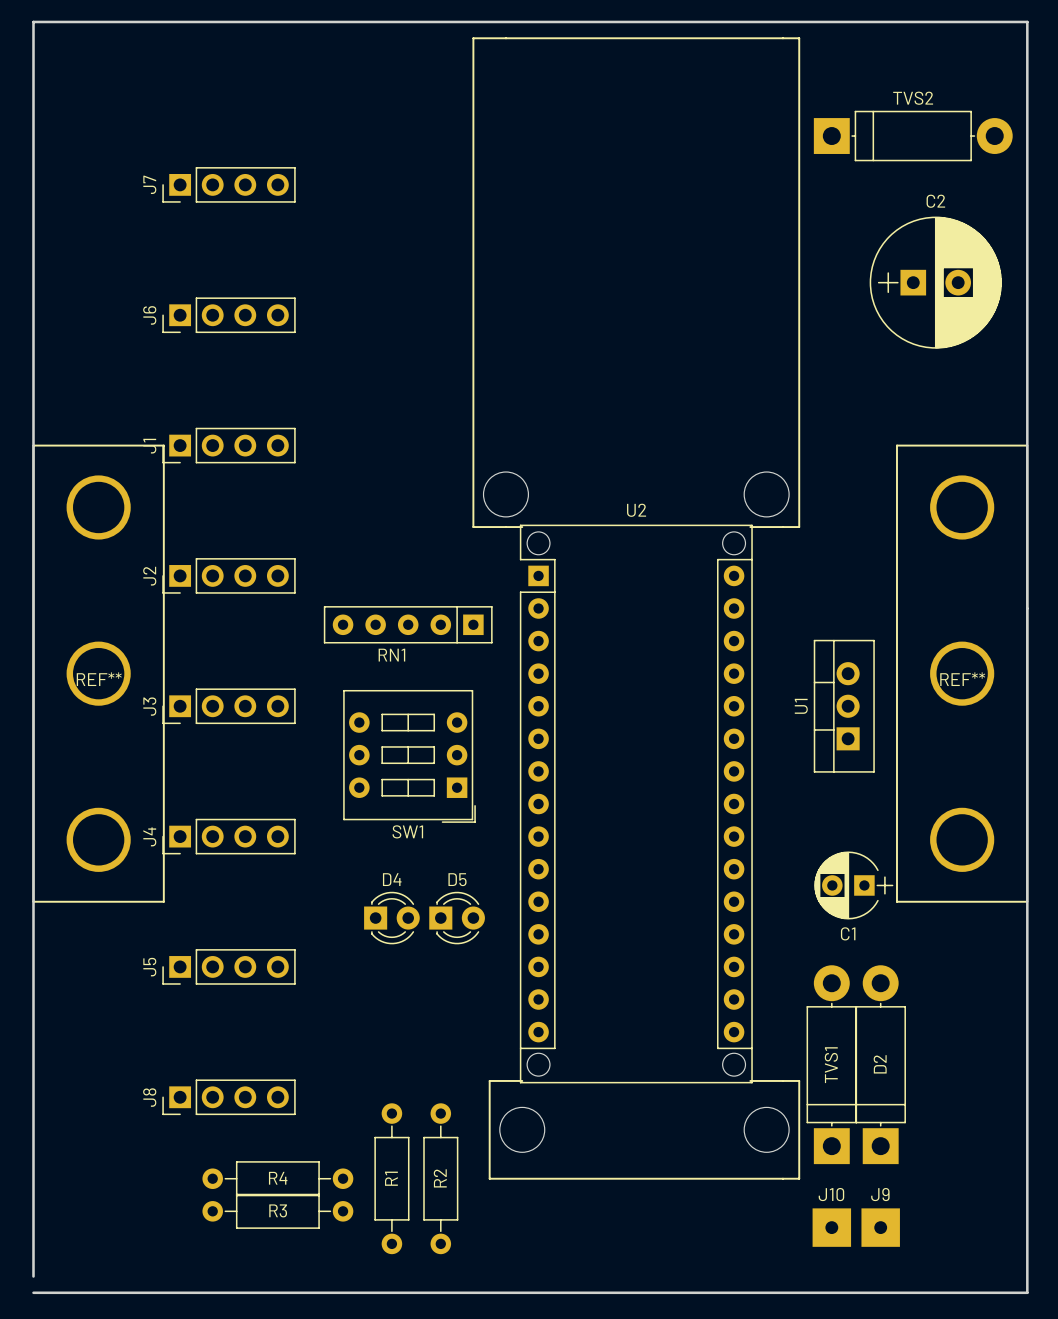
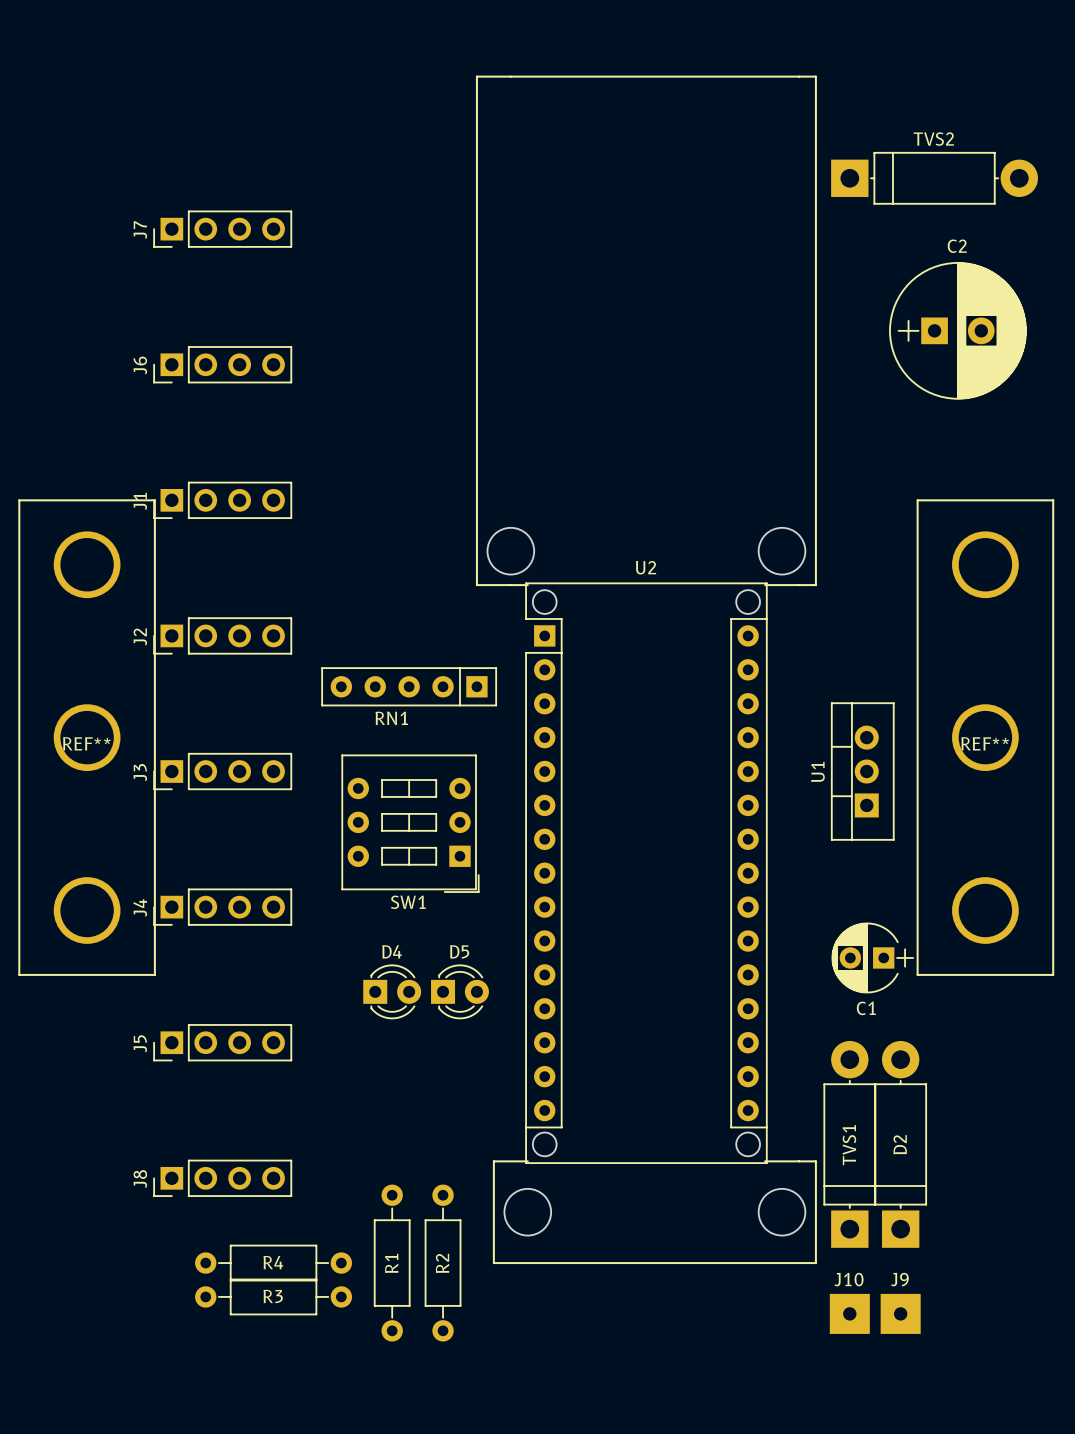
board edge: (33, 1276) (33, 21) (1027, 21) (1027, 1292) (33, 1292) -> none

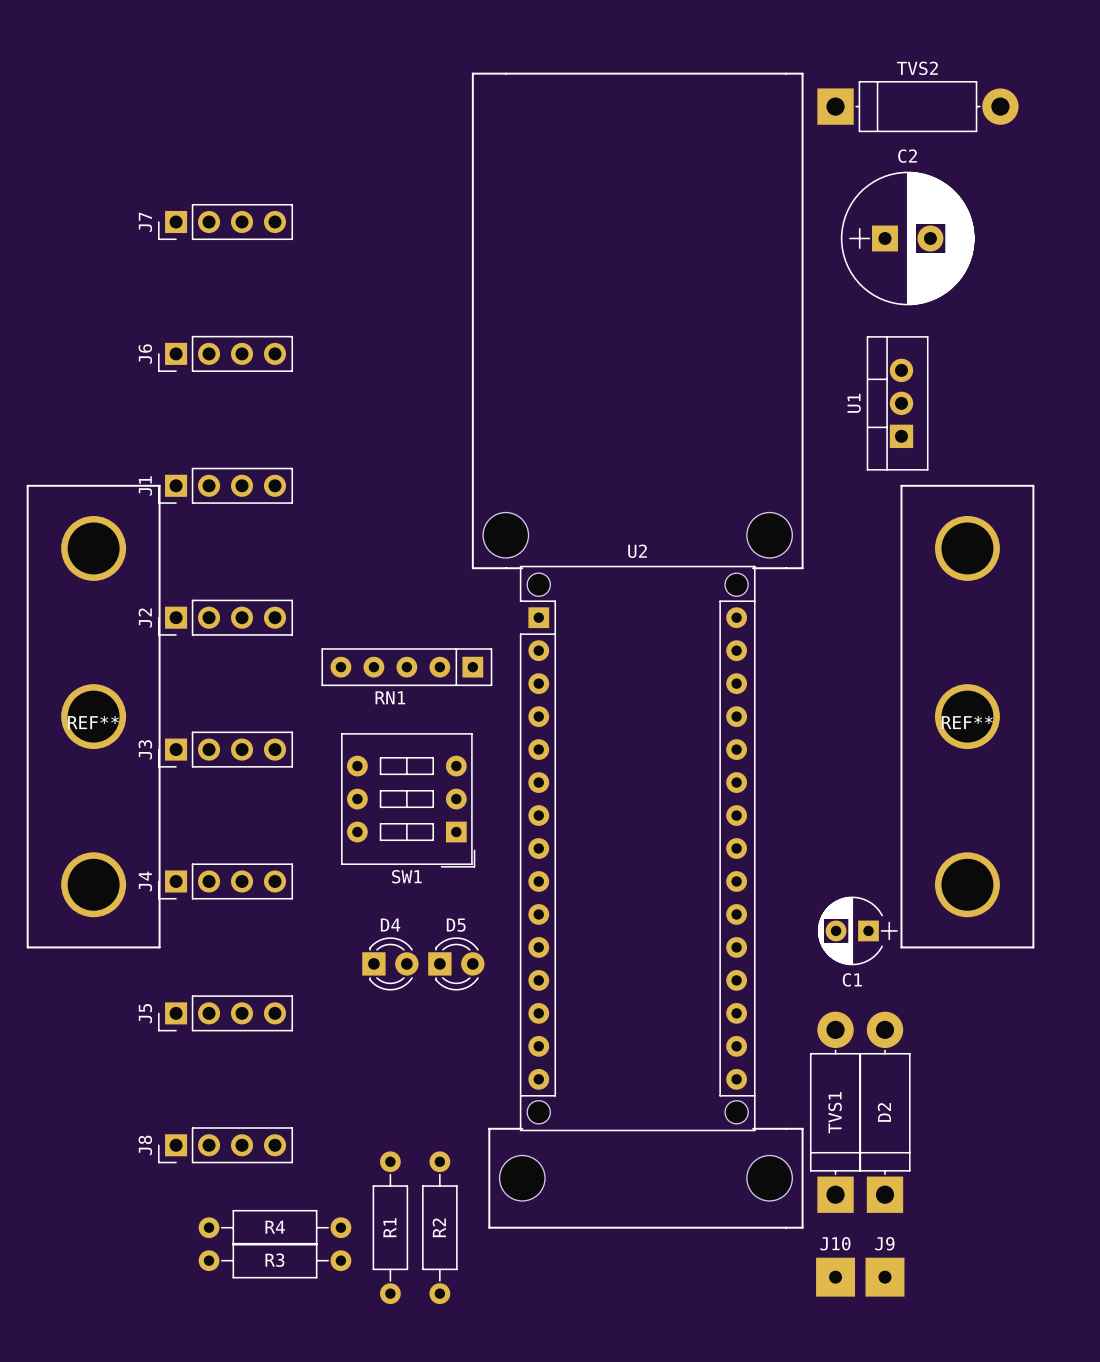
TVS2 position: (934, 178) -> (917, 106)
C2 position: (957, 330) -> (907, 238)
U1 position: (862, 771) -> (897, 403)

